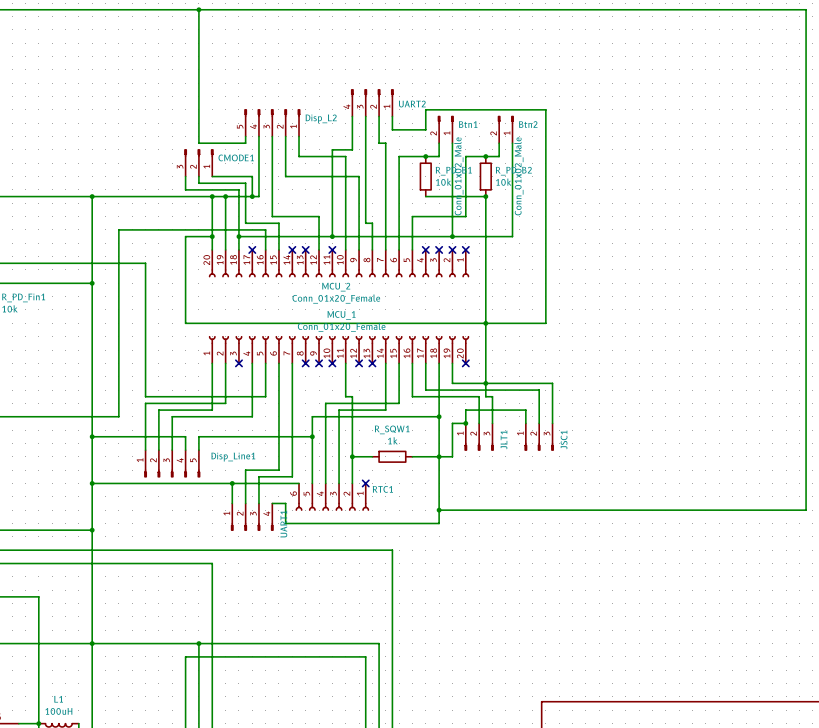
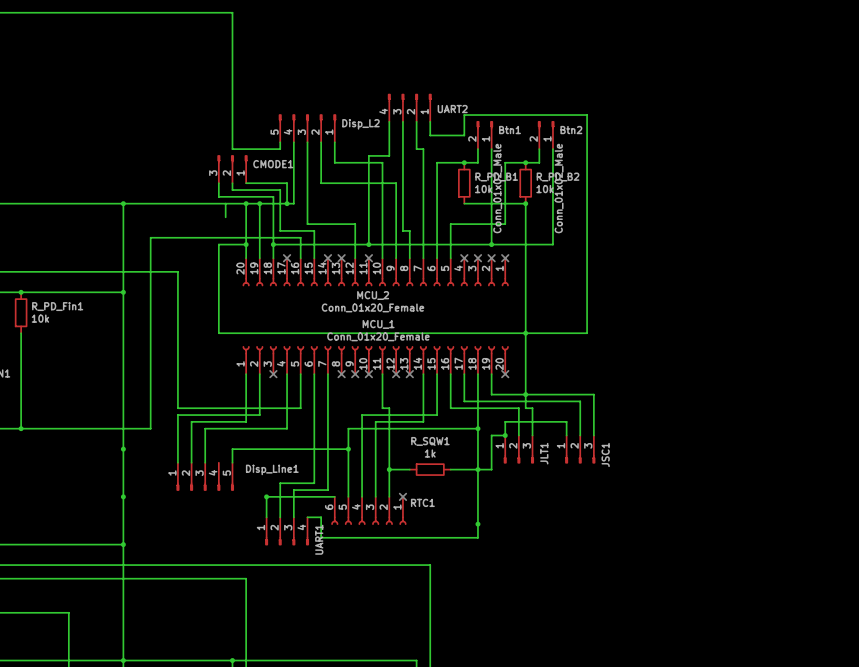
wire: (198, 9) (806, 9) (806, 510) (439, 510) -> none
junction: (198, 9) -> none
wire: none -> (225, 203) (225, 217)
wire: (92, 436) (185, 436) (185, 450) -> none
wire: (92, 483) (232, 483) -> none

